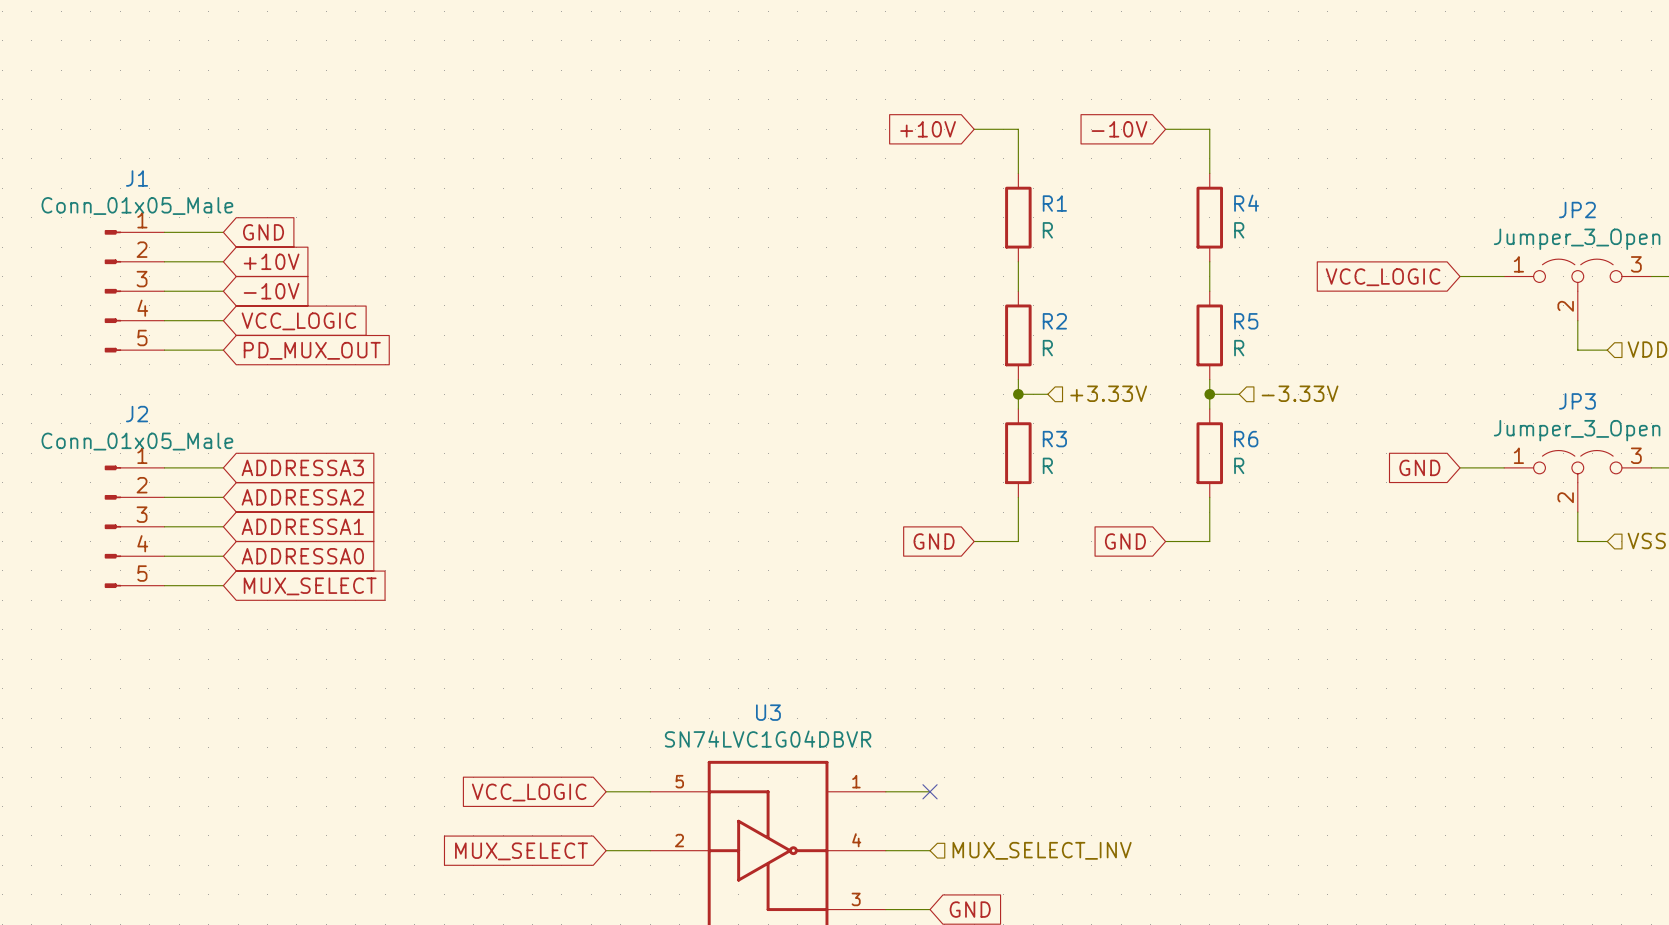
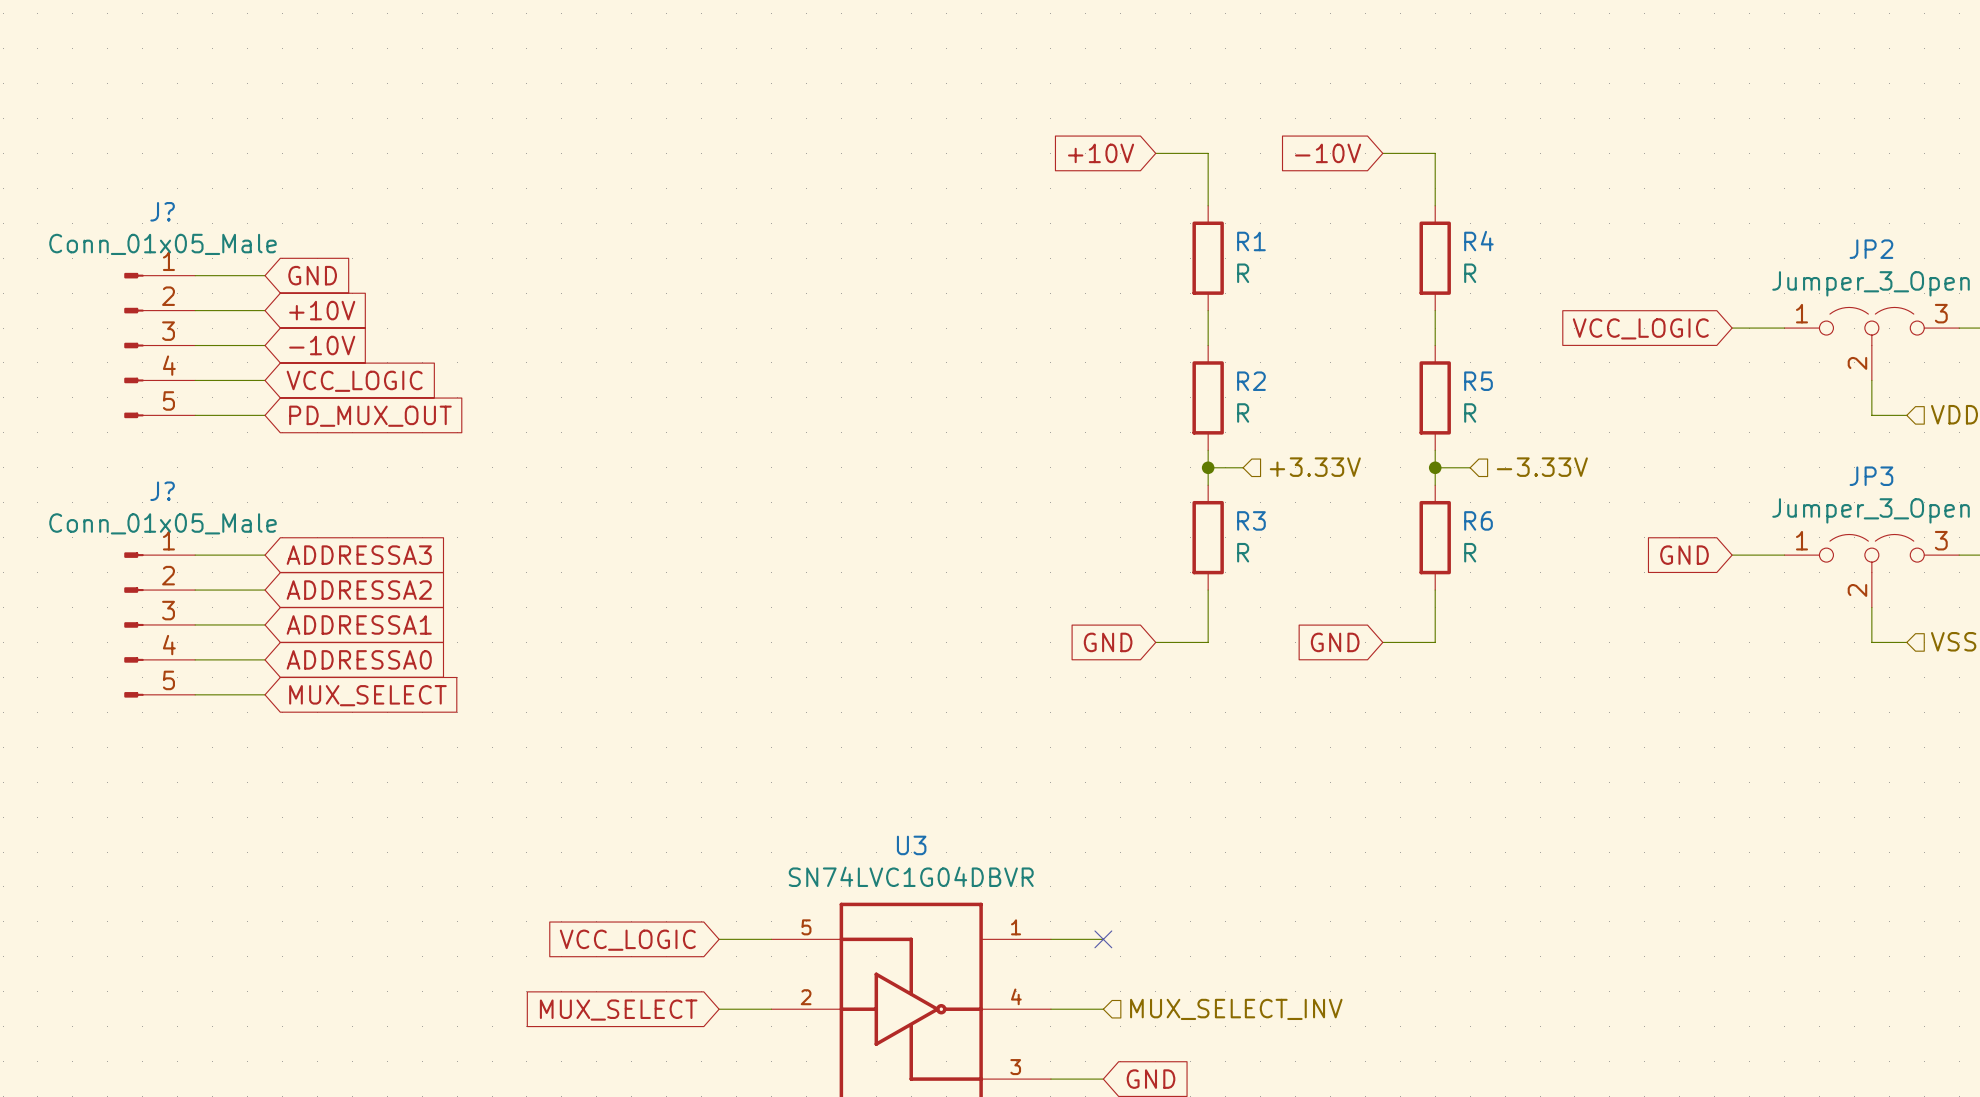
J1 name: J1 (137, 178) -> J? (162, 211)
J2 name: J2 (137, 414) -> J? (162, 491)

